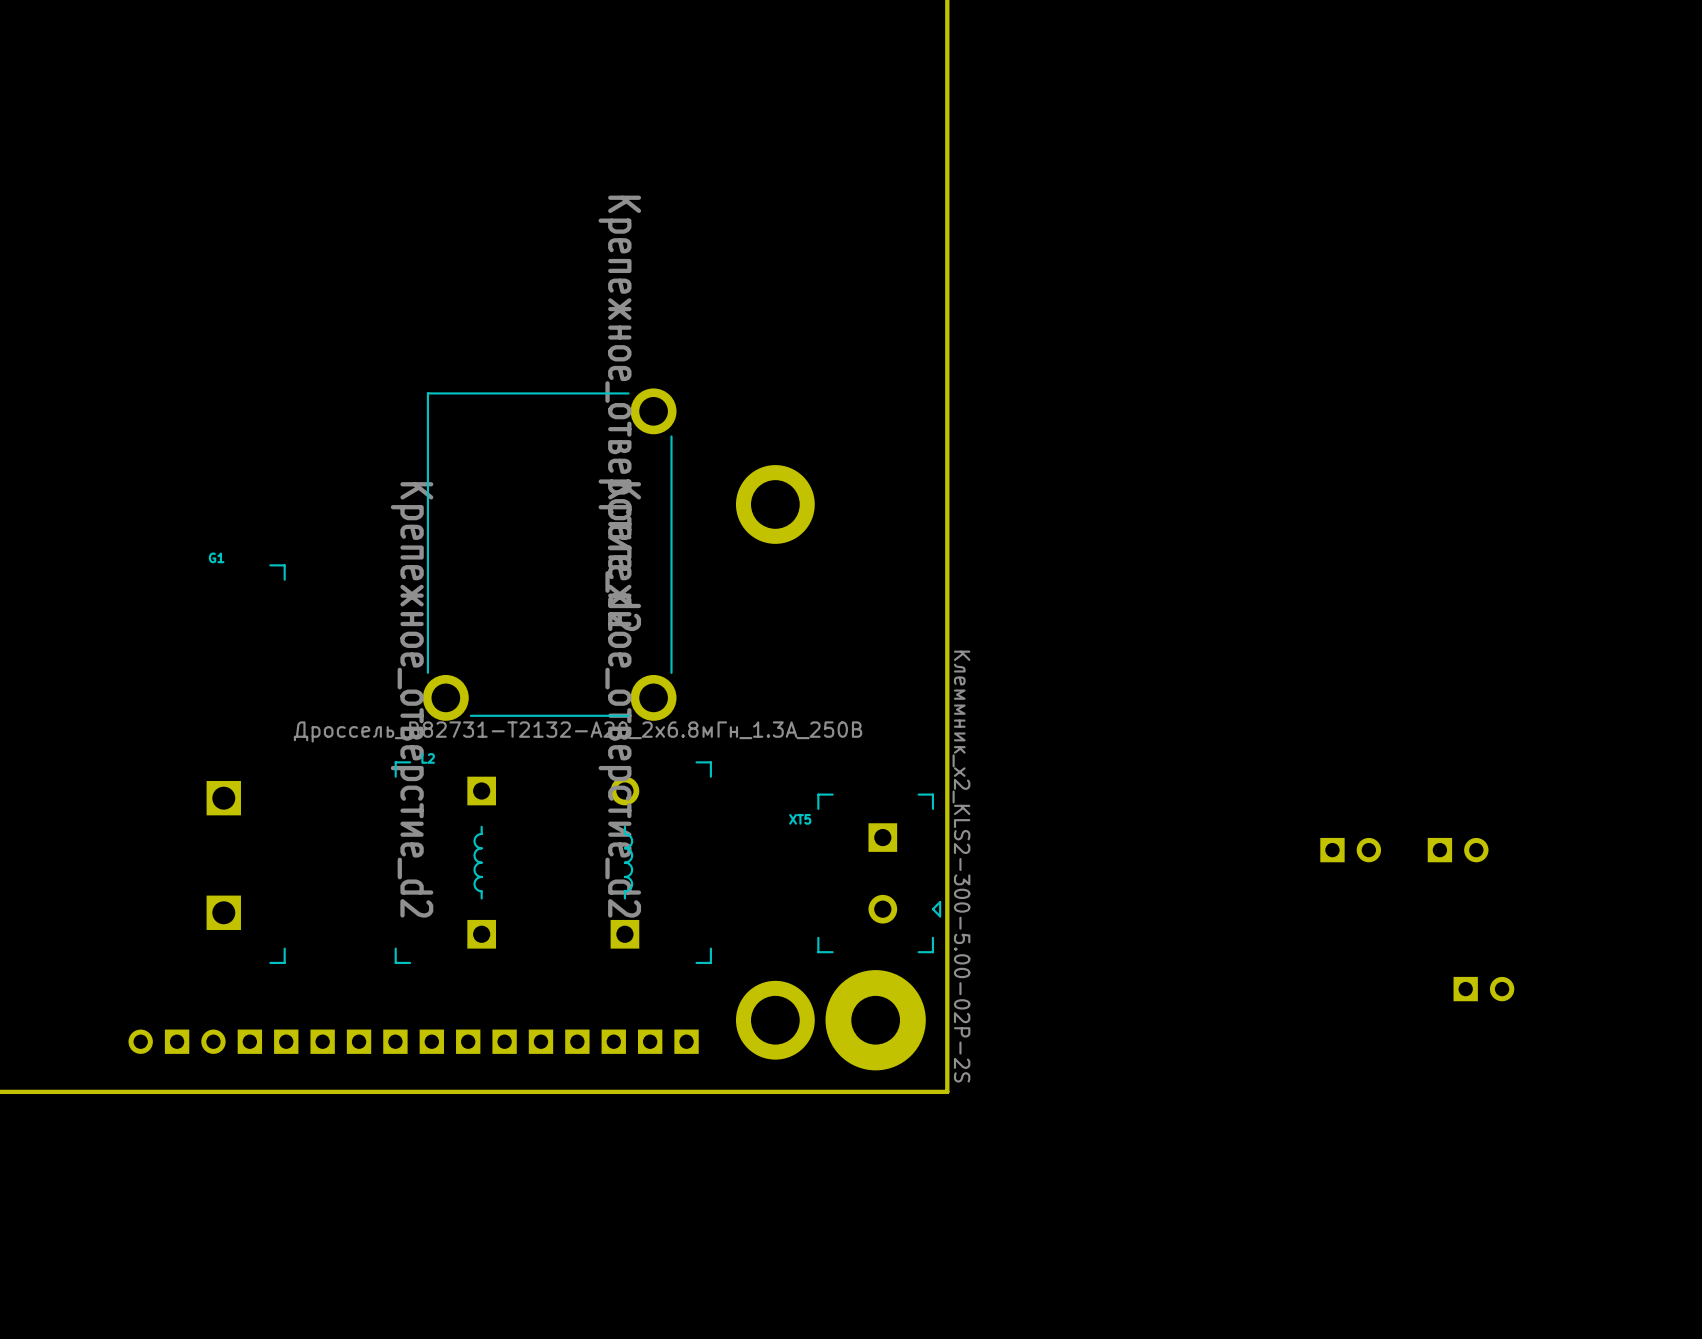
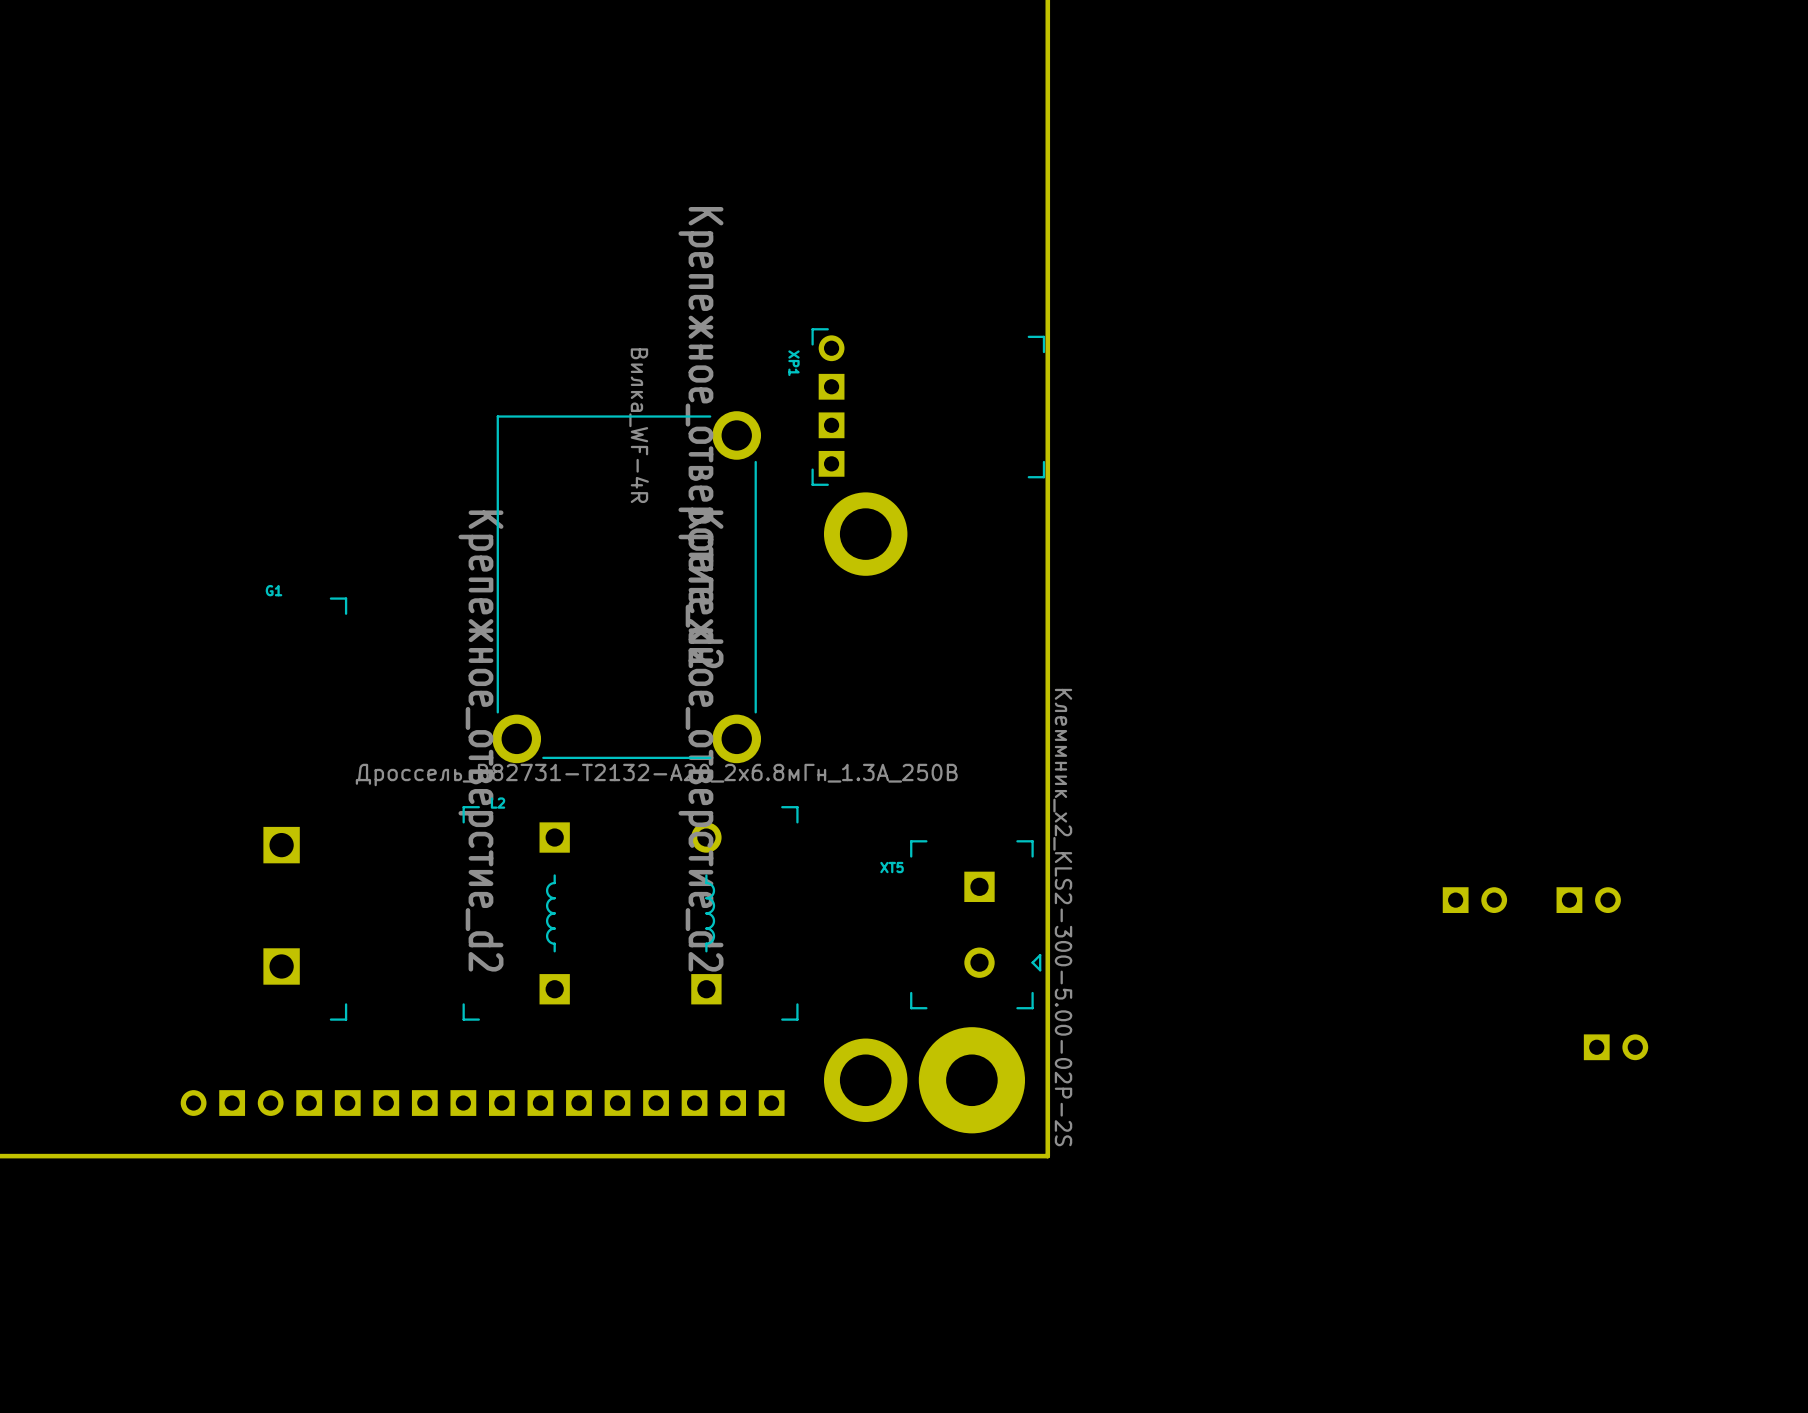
XP1: none -> Вилка_WF-4R (928, 407)

